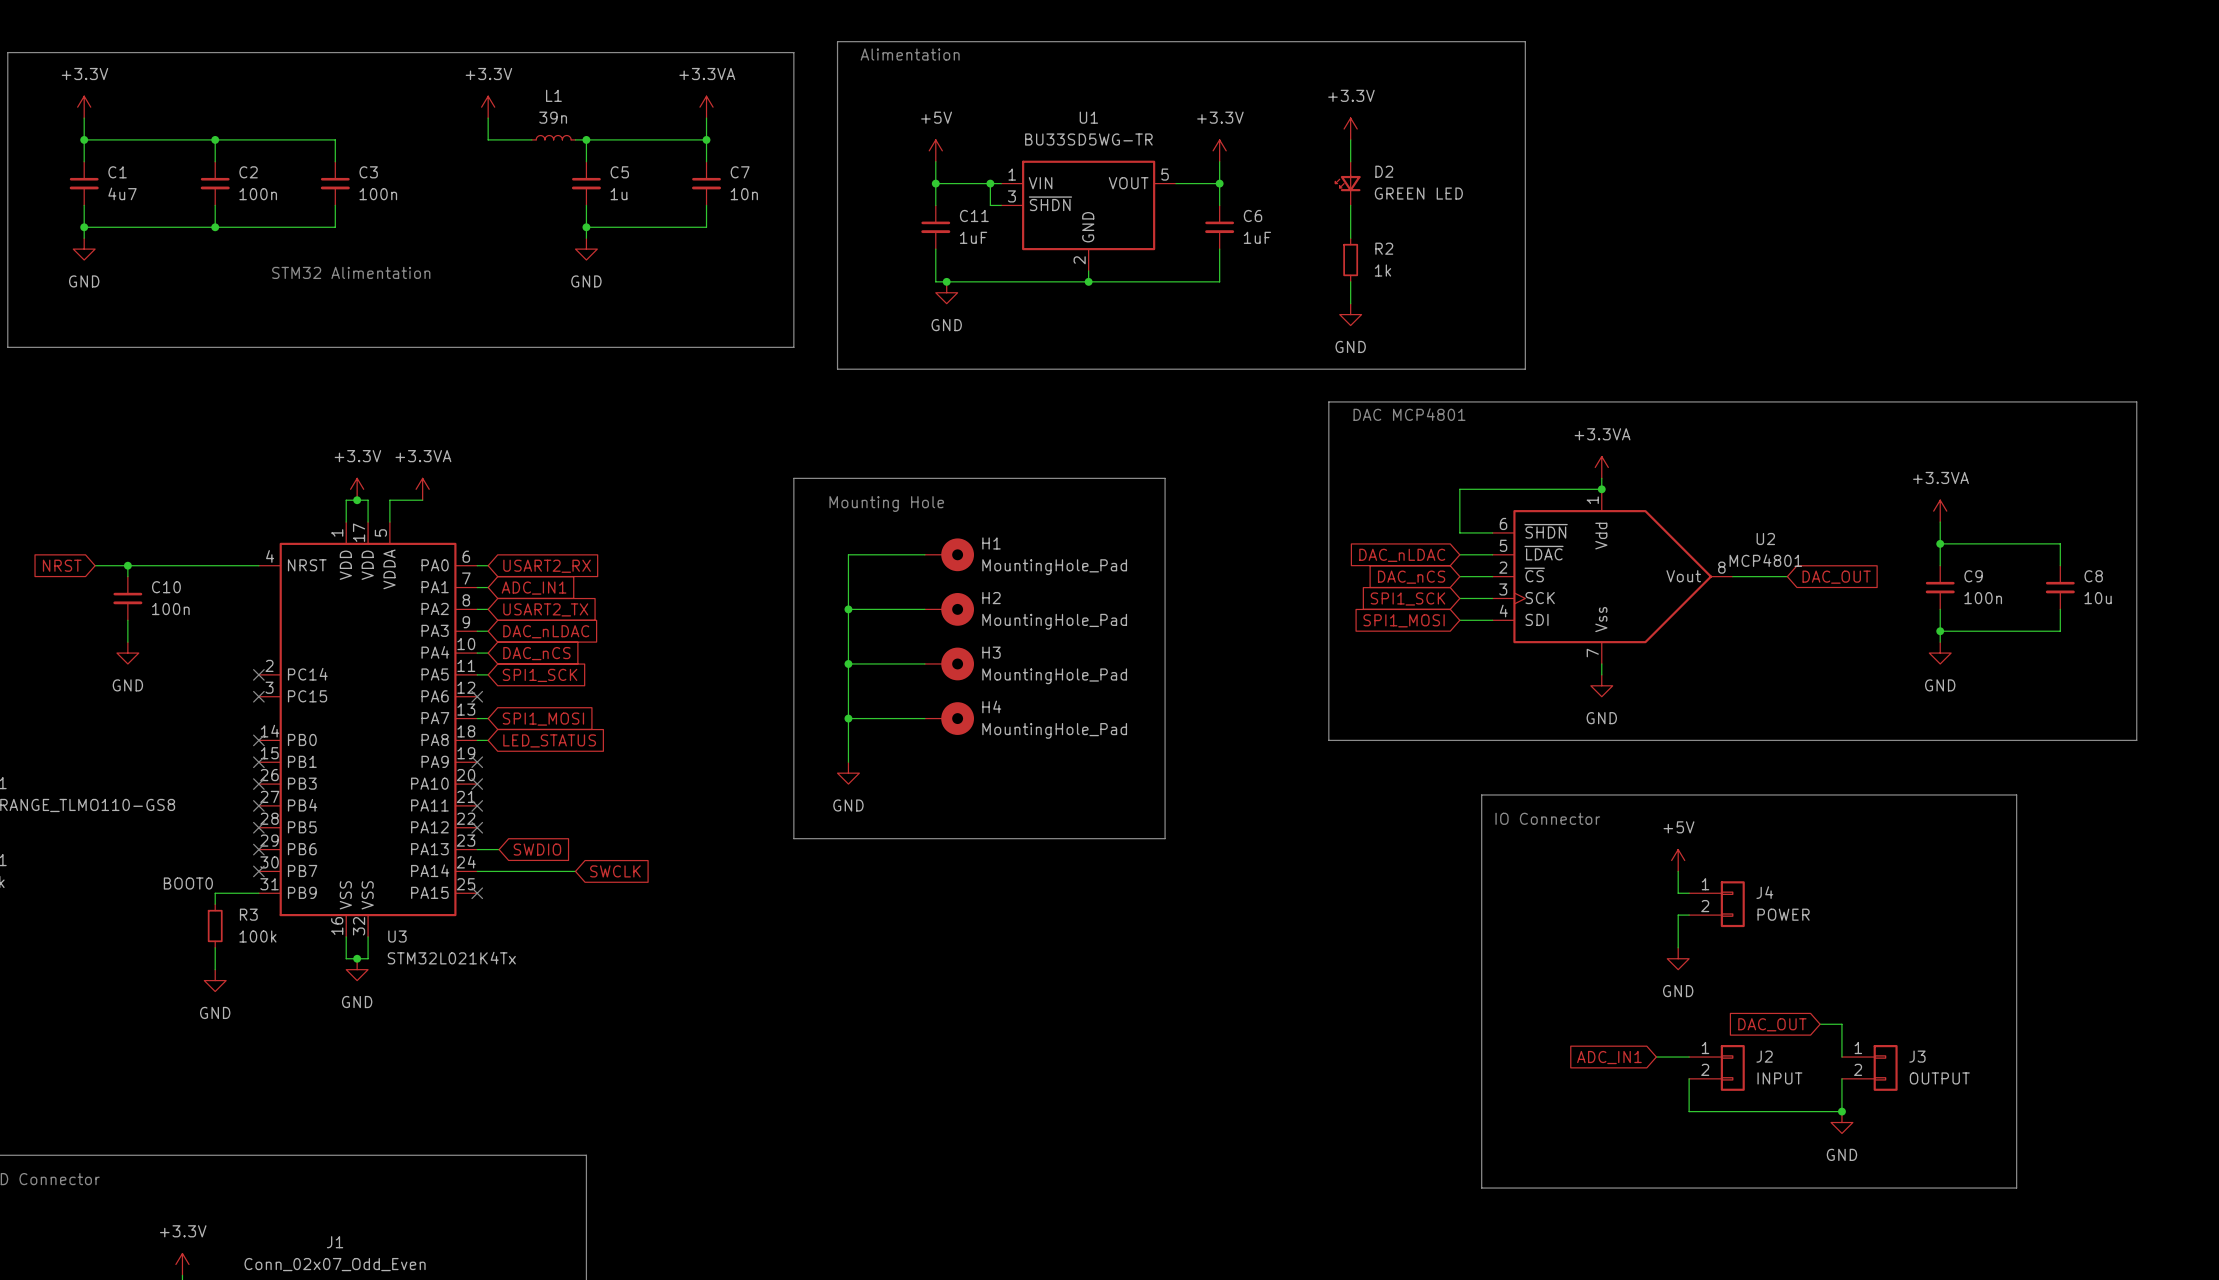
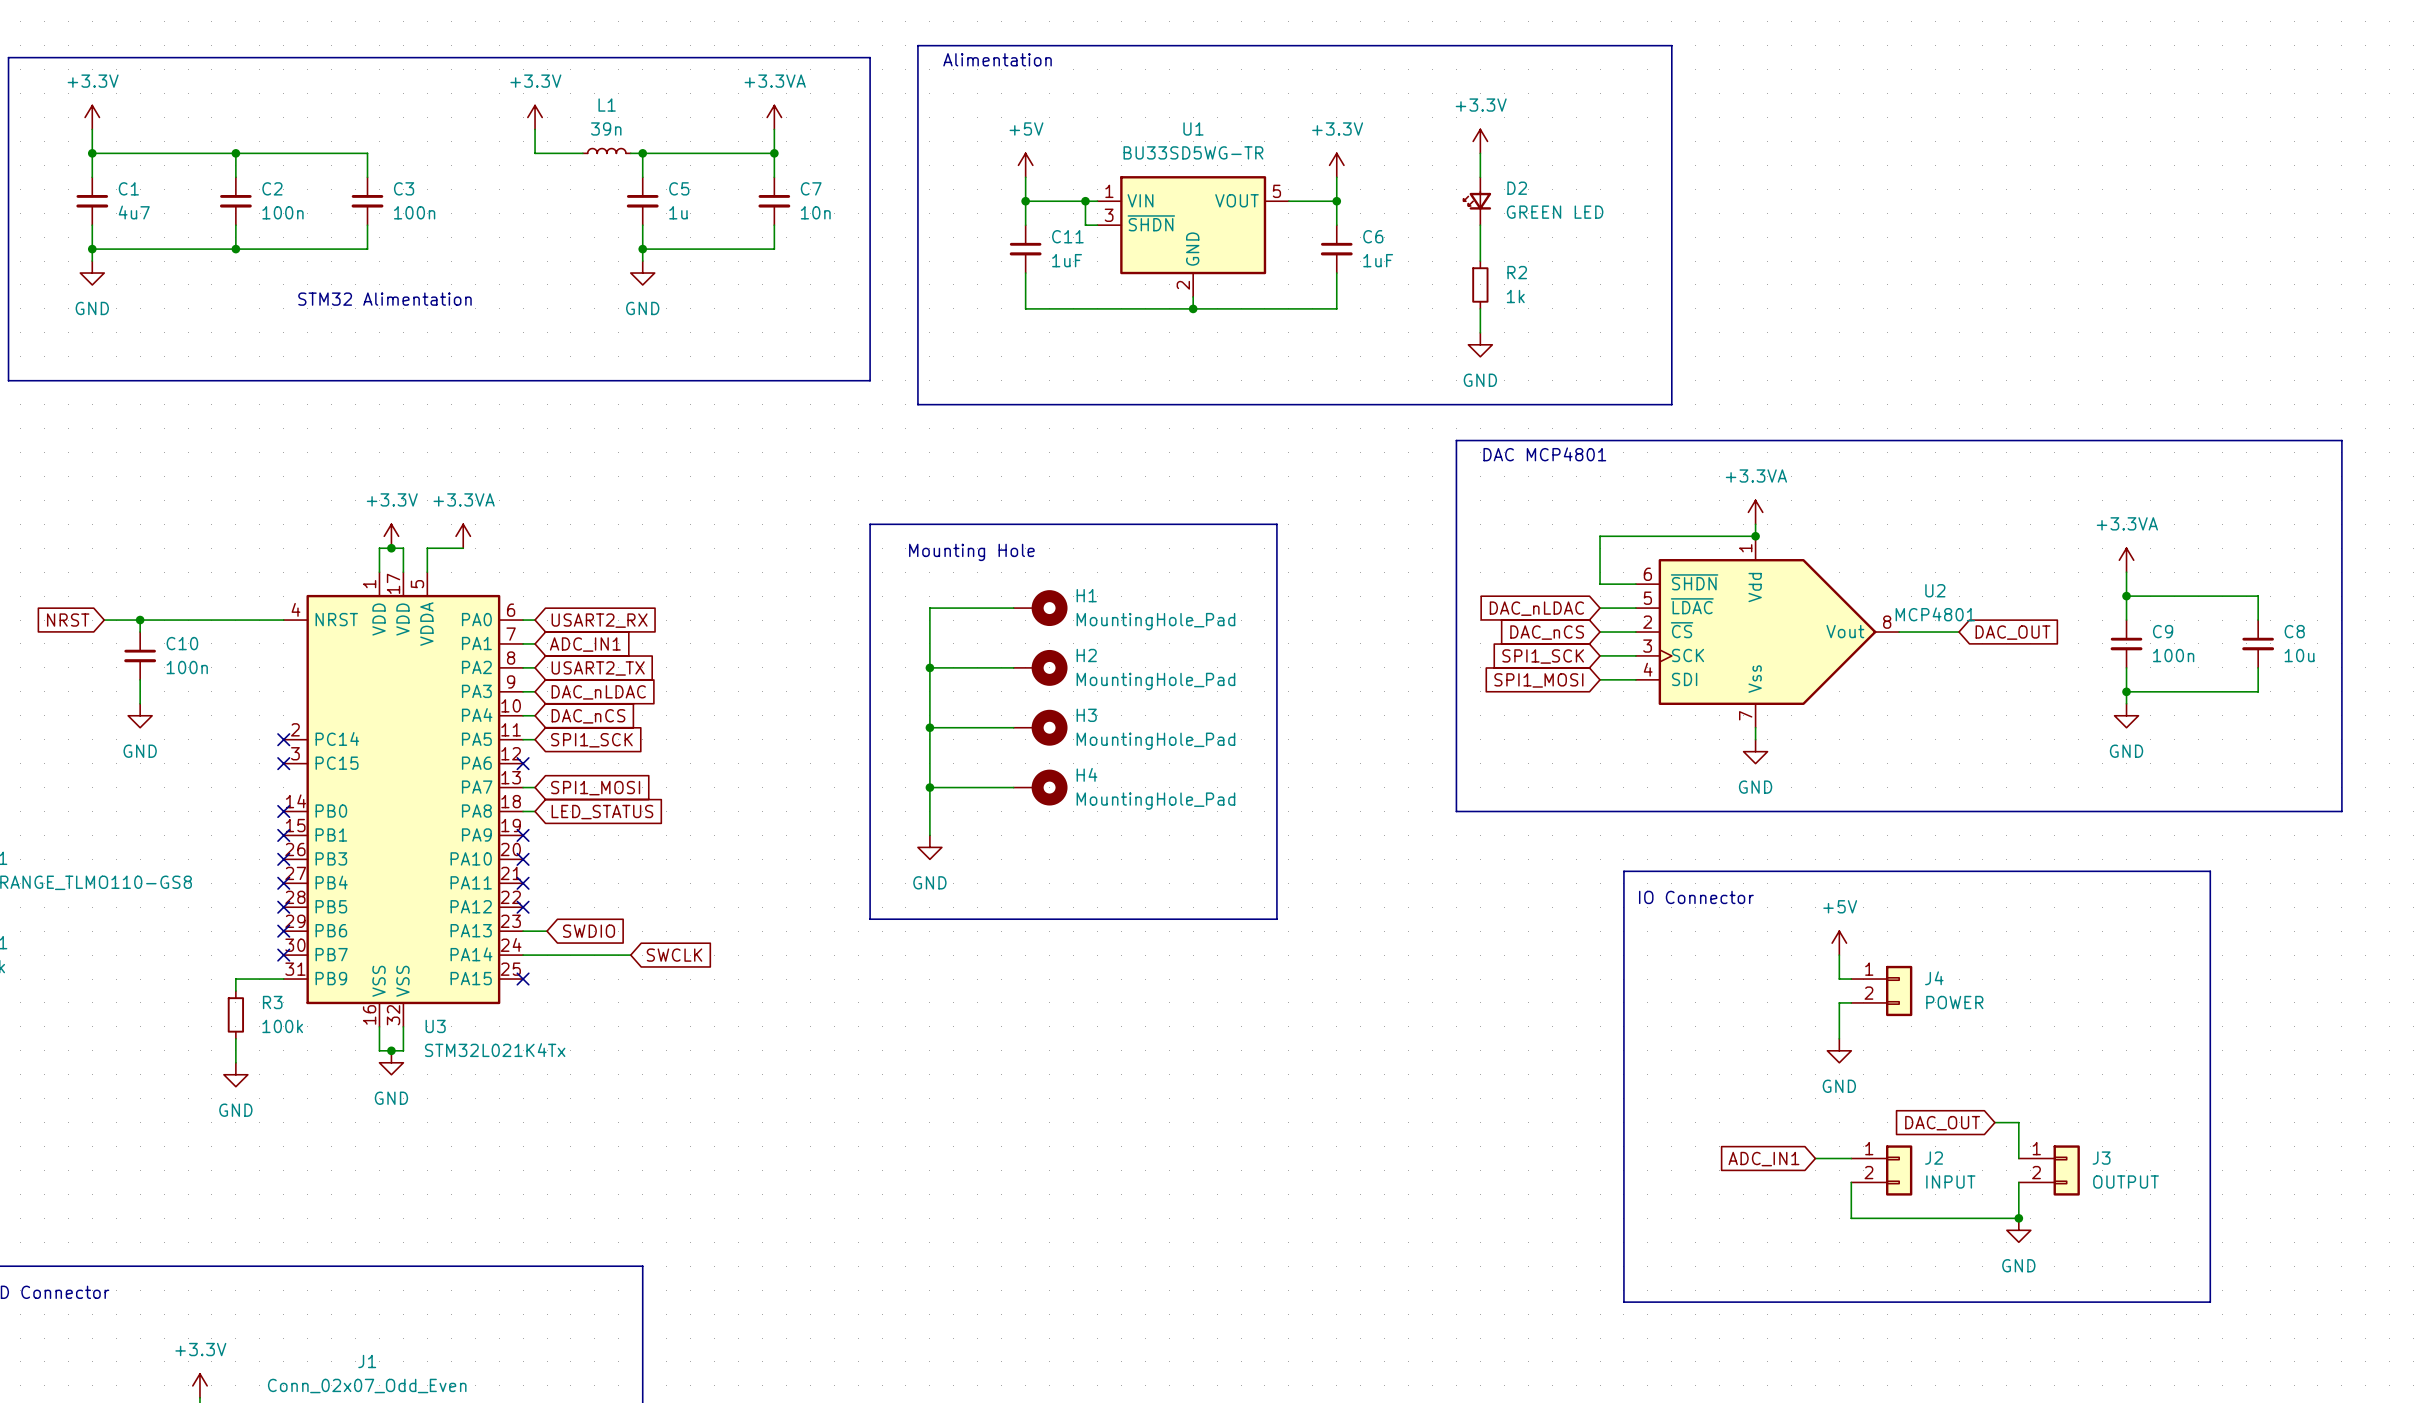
junction: (946, 281) -> none
power symbol: GND (946, 292) -> none
label: BOOT0 (188, 883) -> none

